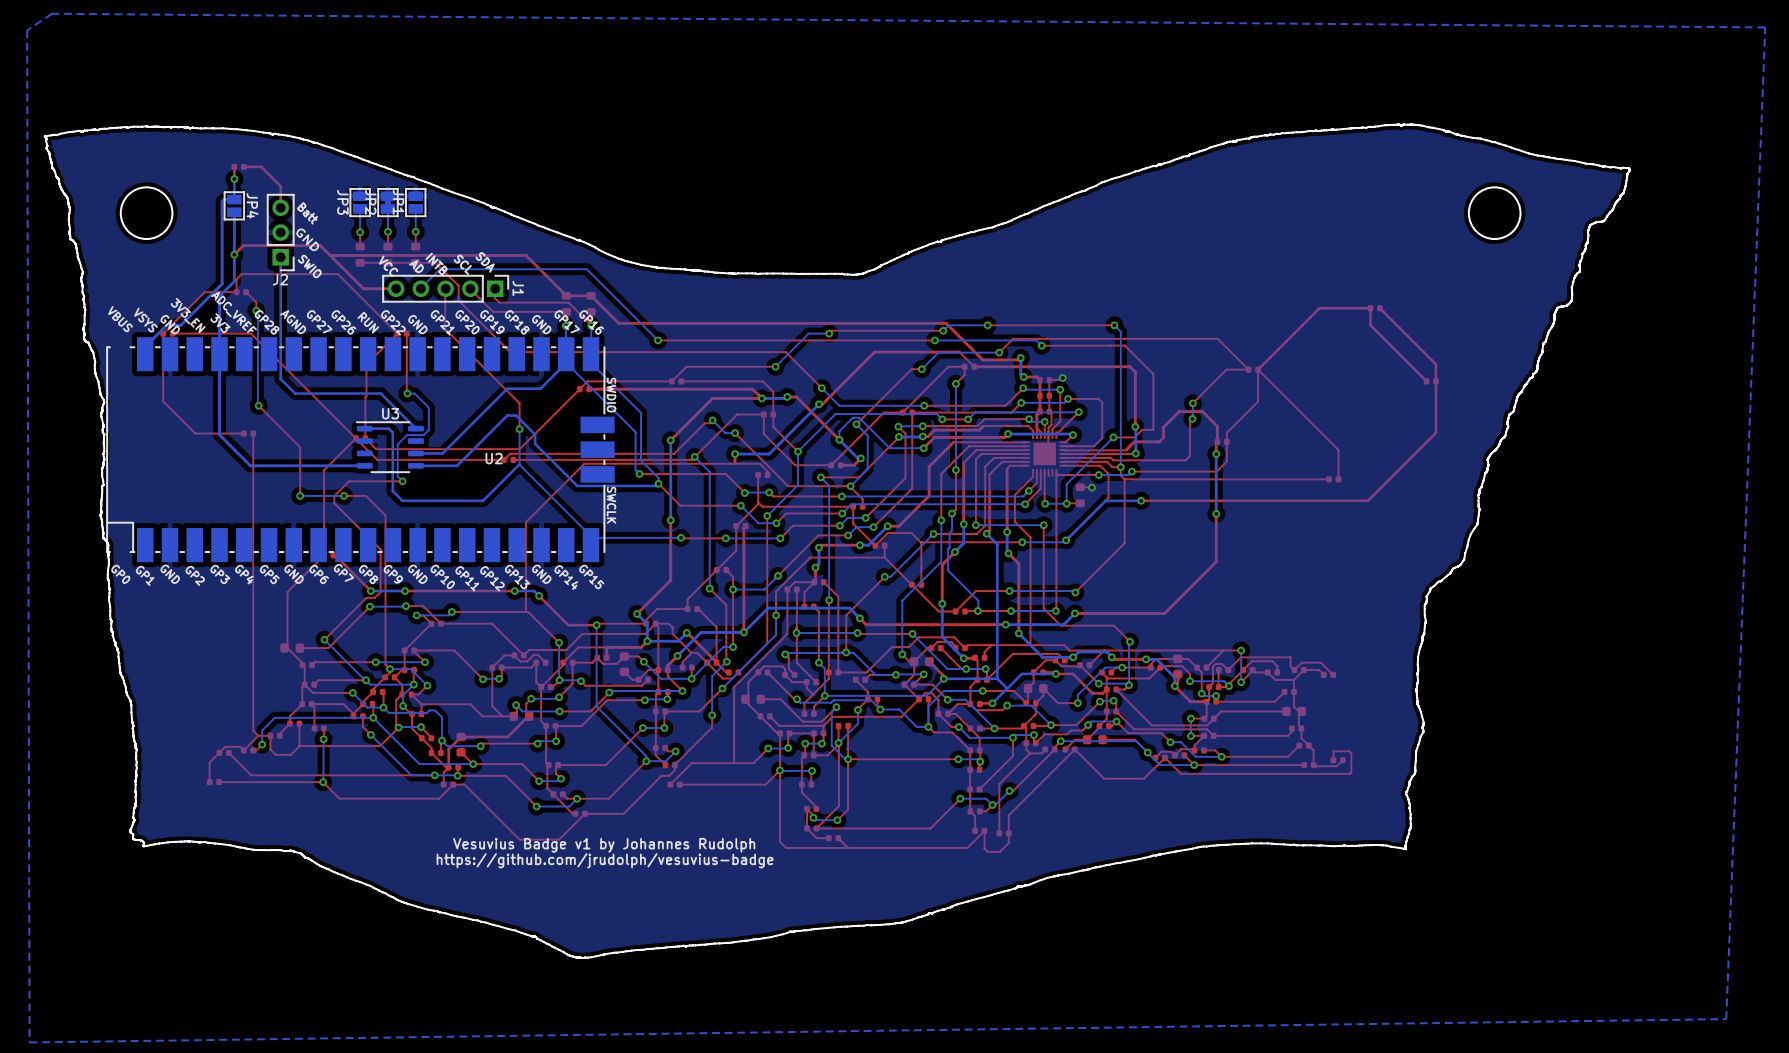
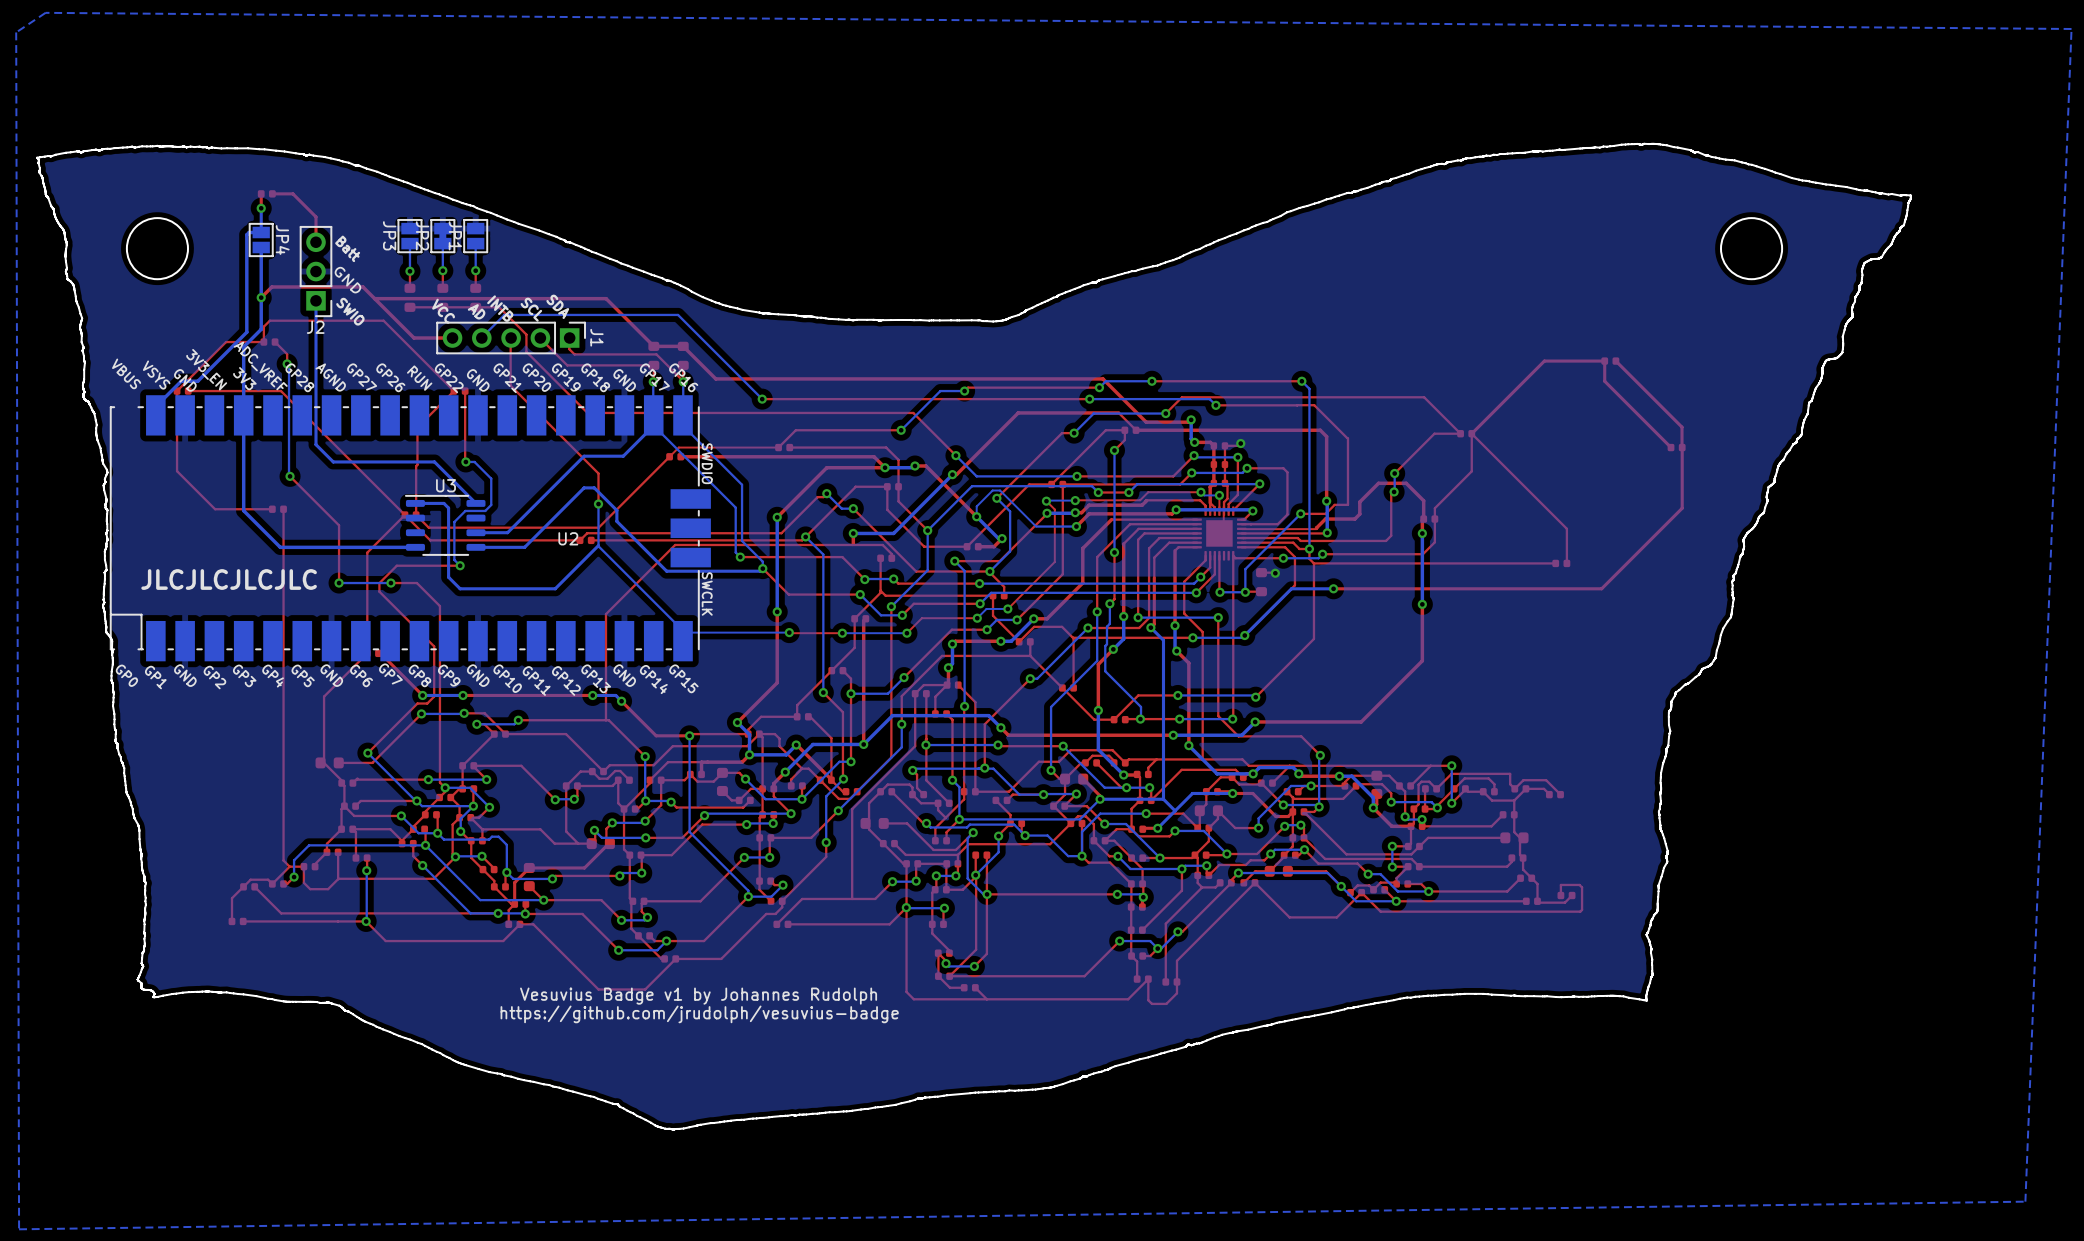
text: none -> JLCJLCJLCJLC (229, 579)

